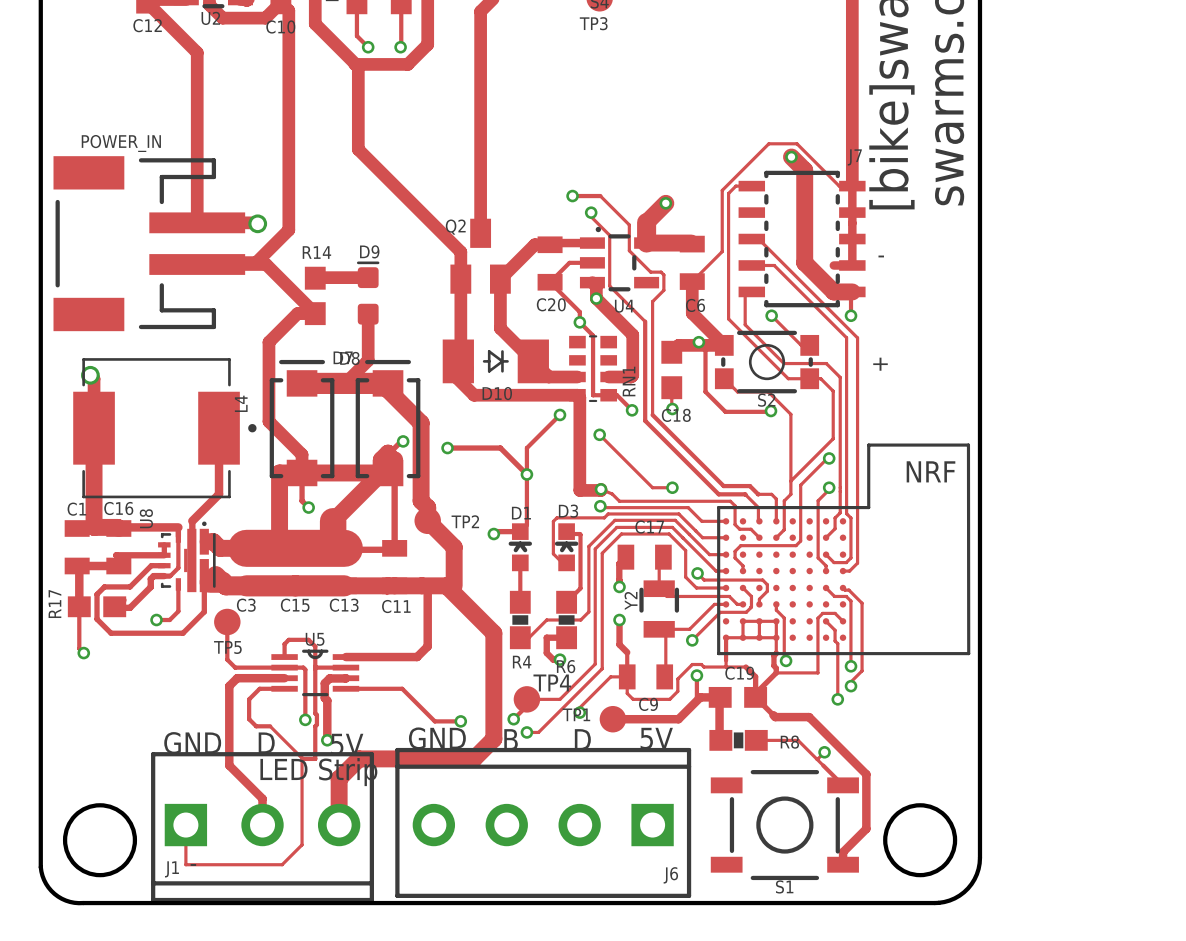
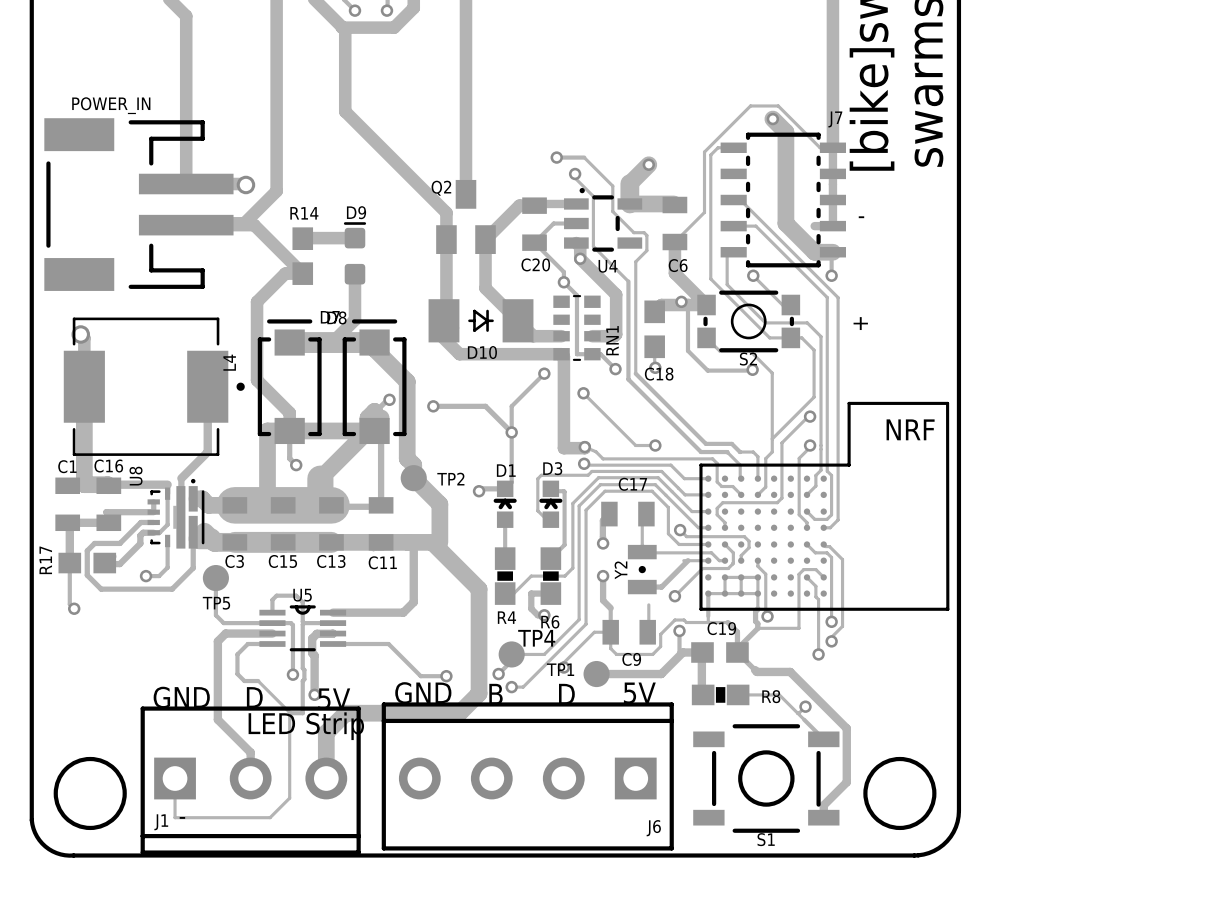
Y2 footprint: [639, 580, 680, 638] -> [627, 544, 657, 595]
track: none -> (687, 560) (661, 587) (642, 587)
track: (714, 604) (689, 629) (659, 629) (665, 635) (665, 649) -> (696, 560) (683, 560)

